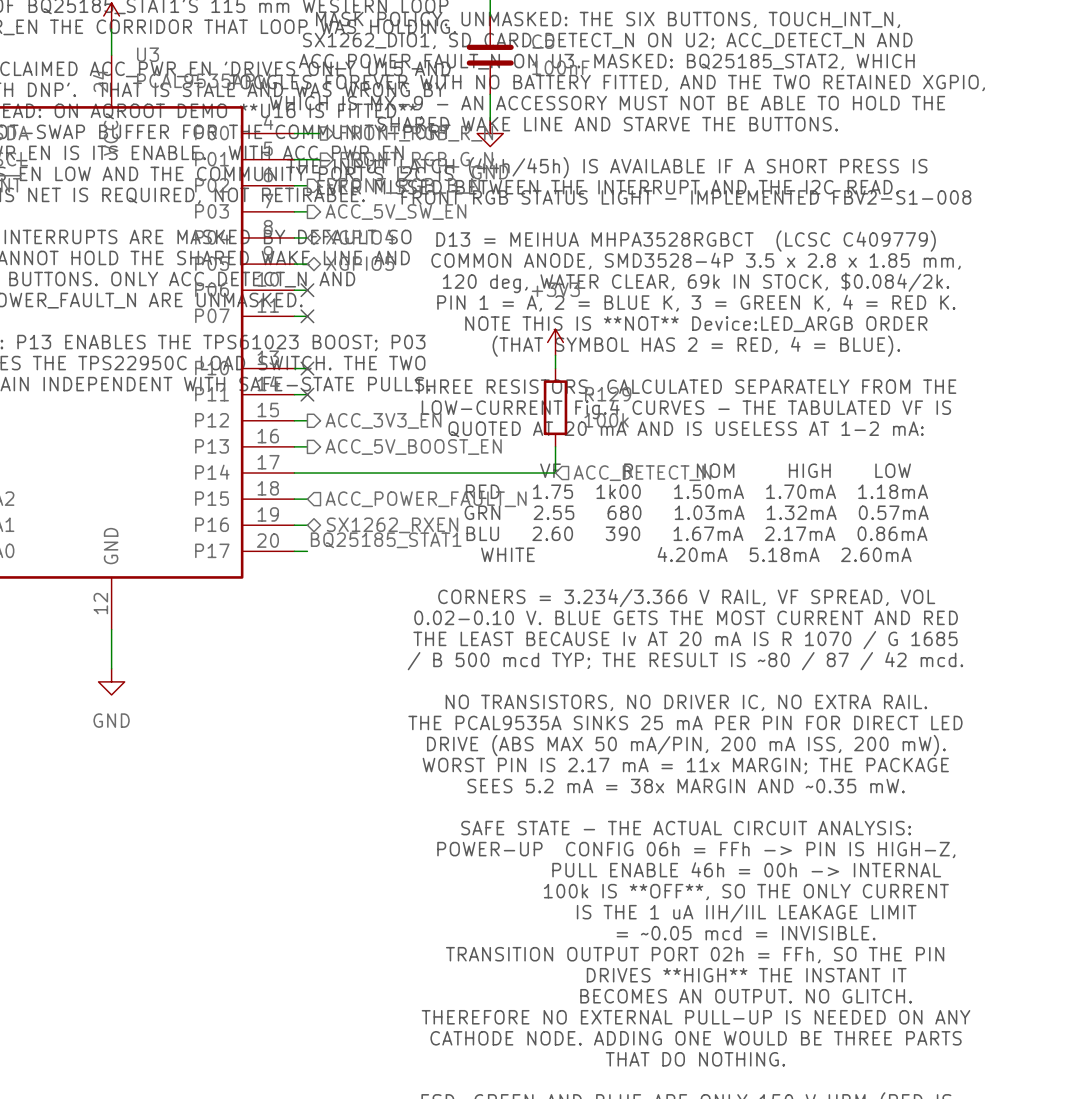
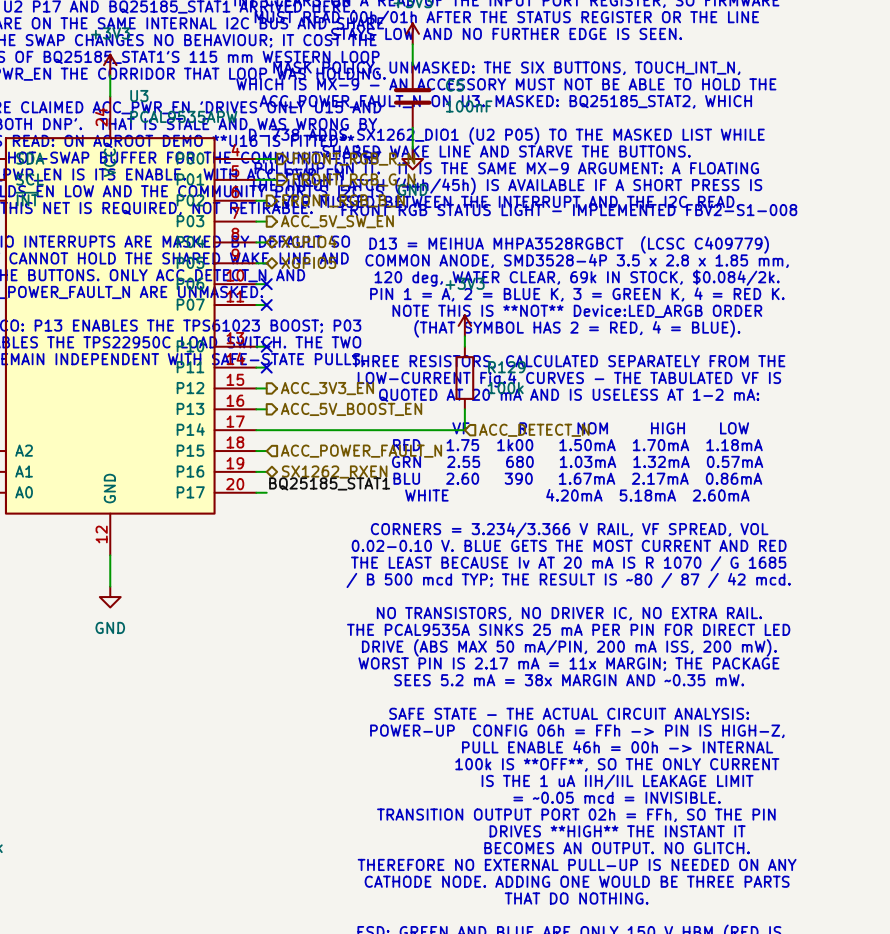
text: SX1262_DIO1, SD_CARD_DETECT_N ON U2; ACC_DETECT_N AND (607, 40) -> WHICH IS MX-9 - AN ACCESSORY MUST NOT BE ABLE TO HOLD THE (506, 84)
text: TOGGLES FOREVER WITH NO BATTERY FITTED, AND THE TWO RETAINED XGPIO, (607, 83) -> none
text: WHICH IS MX-9 - AN ACCESSORY MUST NOT BE ABLE TO HOLD THE (607, 103) -> D-738 ADDS SX1262_DIO1 (U2 P05) TO THE MASKED LIST WHILE (506, 135)
text: none -> PULL-UP ON IT. IT IS THE SAME MX-9 ARGUMENT: A FLOATING (506, 168)

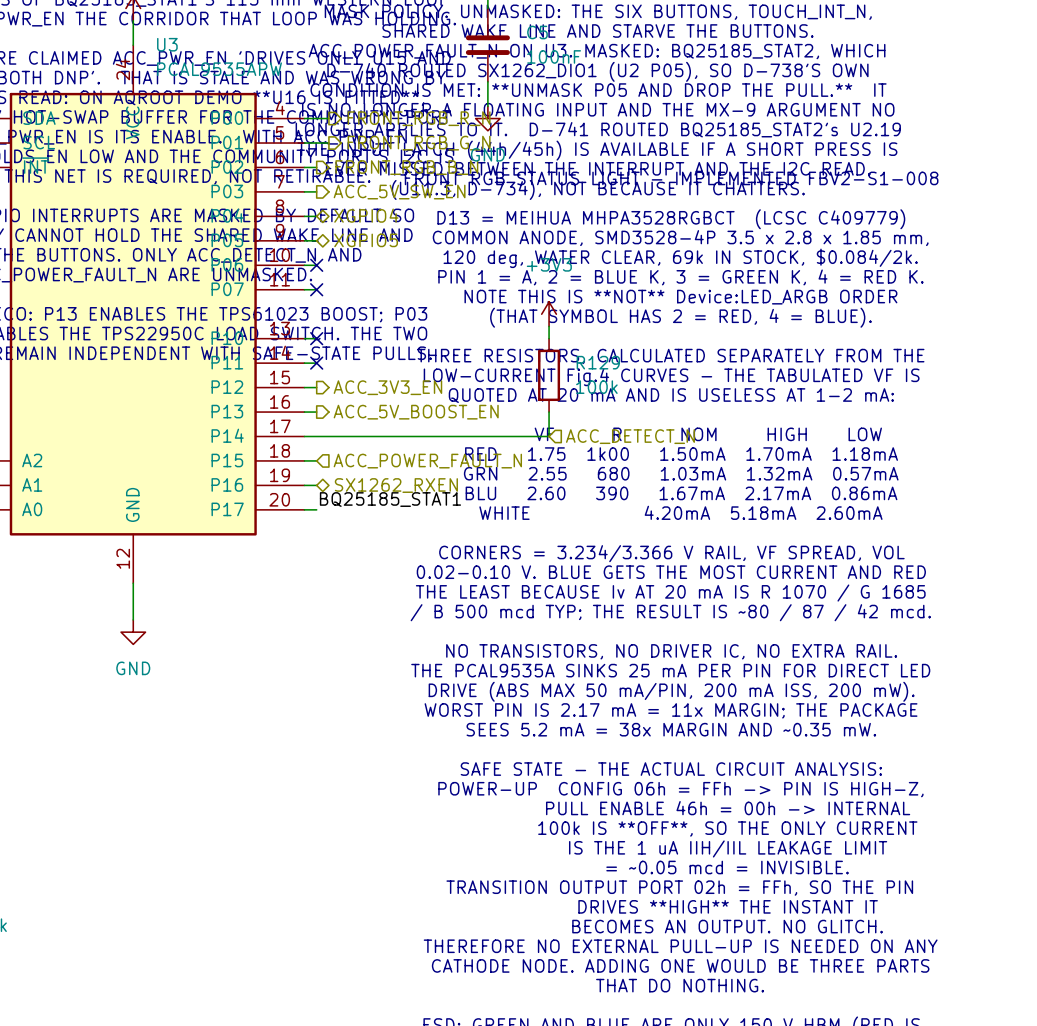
text: WHICH IS MX-9 - AN ACCESSORY MUST NOT BE ABLE TO HOLD THE (506, 84) -> SHARED WAKE LINE AND STARVE THE BUTTONS. (597, 31)
text: none -> D-740 ROUTED SX1262_DIO1 (U2 P05), SO D-738'S OWN (597, 71)
text: D-738 ADDS SX1262_DIO1 (U2 P05) TO THE MASKED LIST WHILE (506, 135) -> CONDITION IS MET: **UNMASK P05 AND DROP THE PULL.** IT (598, 90)
text: SHARED WAKE LINE AND STARVE THE BUTTONS. (506, 151) -> IS NO LONGER A FLOATING INPUT AND THE MX-9 ARGUMENT NO (598, 109)
text: PULL-UP ON IT. IT IS THE SAME MX-9 ARGUMENT: A FLOATING (506, 168) -> LONGER APPLIES TO IT. D-741 ROUTED BQ25185_STAT2's U2.19 (598, 129)
text: none -> (U11.3, D-734), NOT BECAUSE IT CHATTERS. (598, 189)

